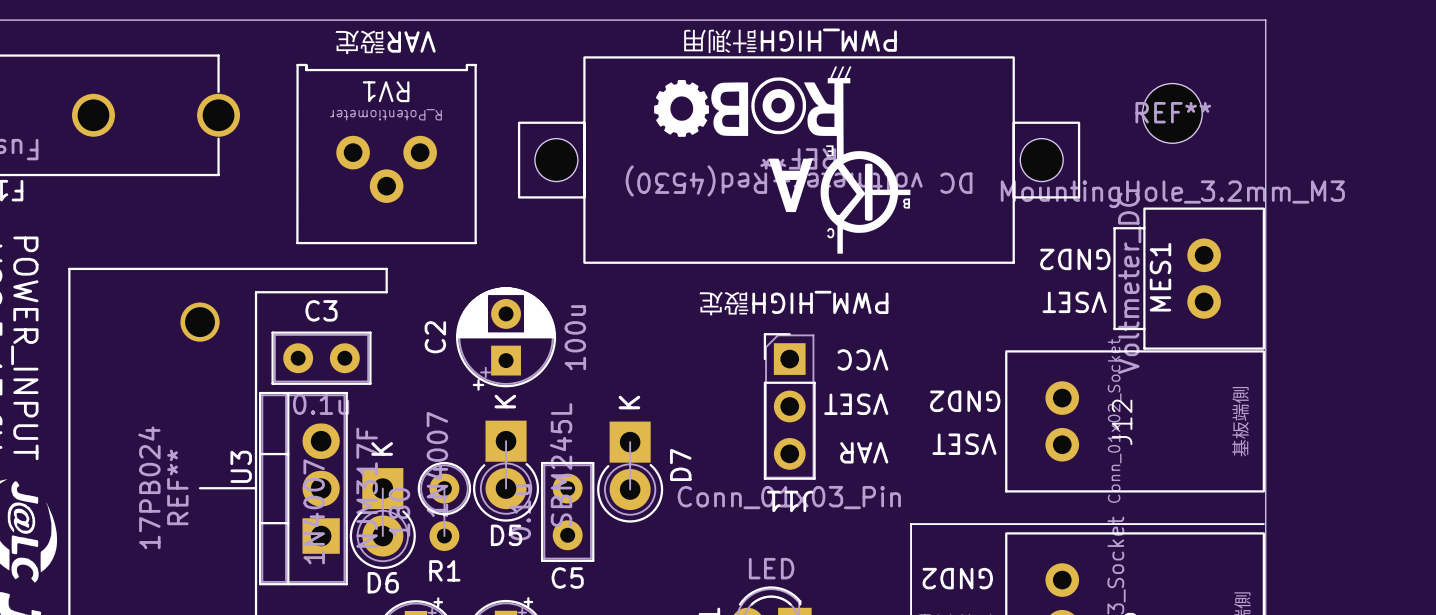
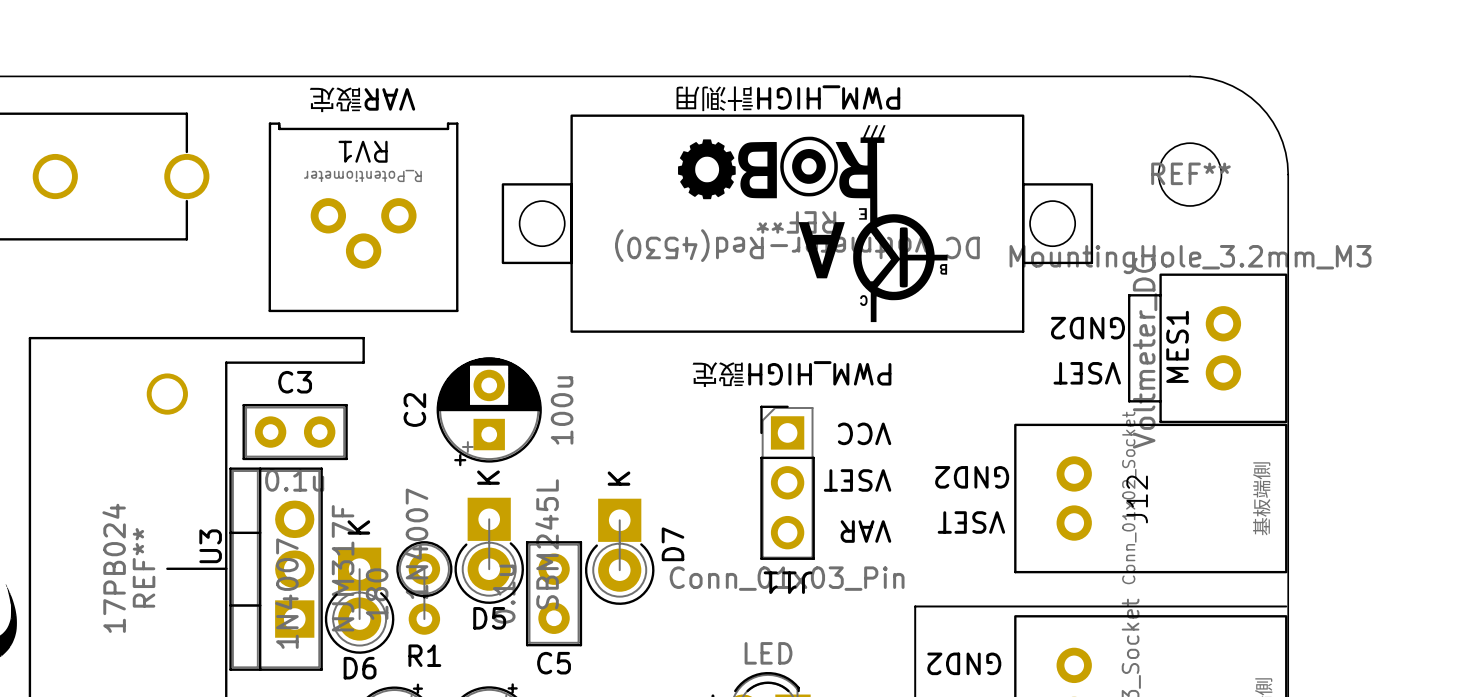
board edge: (1172, 20) (1265, 20) (1265, 113) -> (1190, 76) (1211, 78) (1232, 86) (1259, 105) (1273, 122) (1282, 142) (1288, 174)
drawing position: (782, 160) -> (812, 223)

